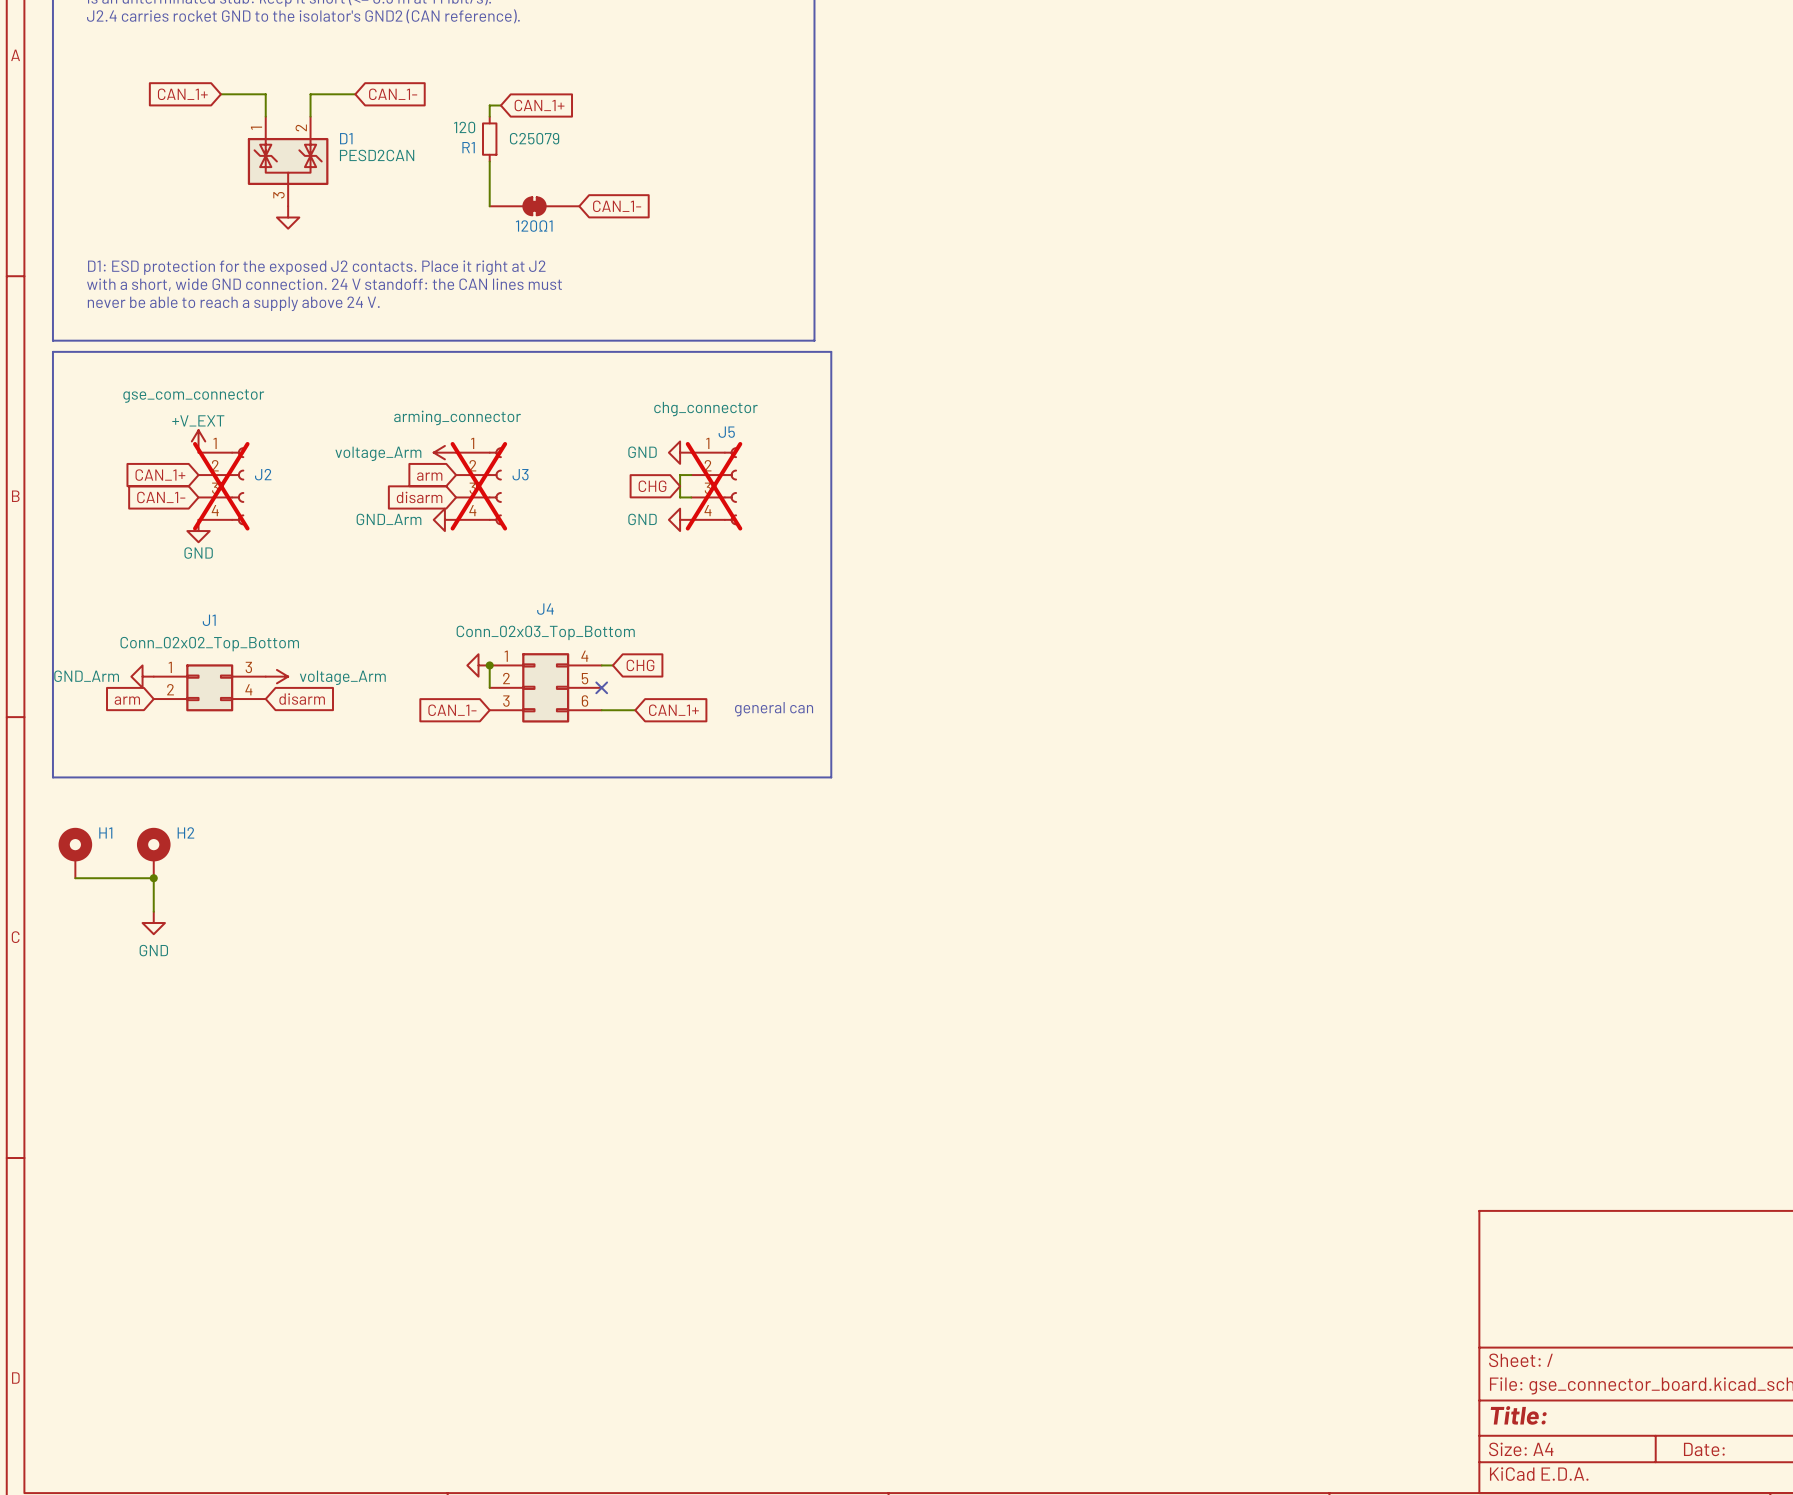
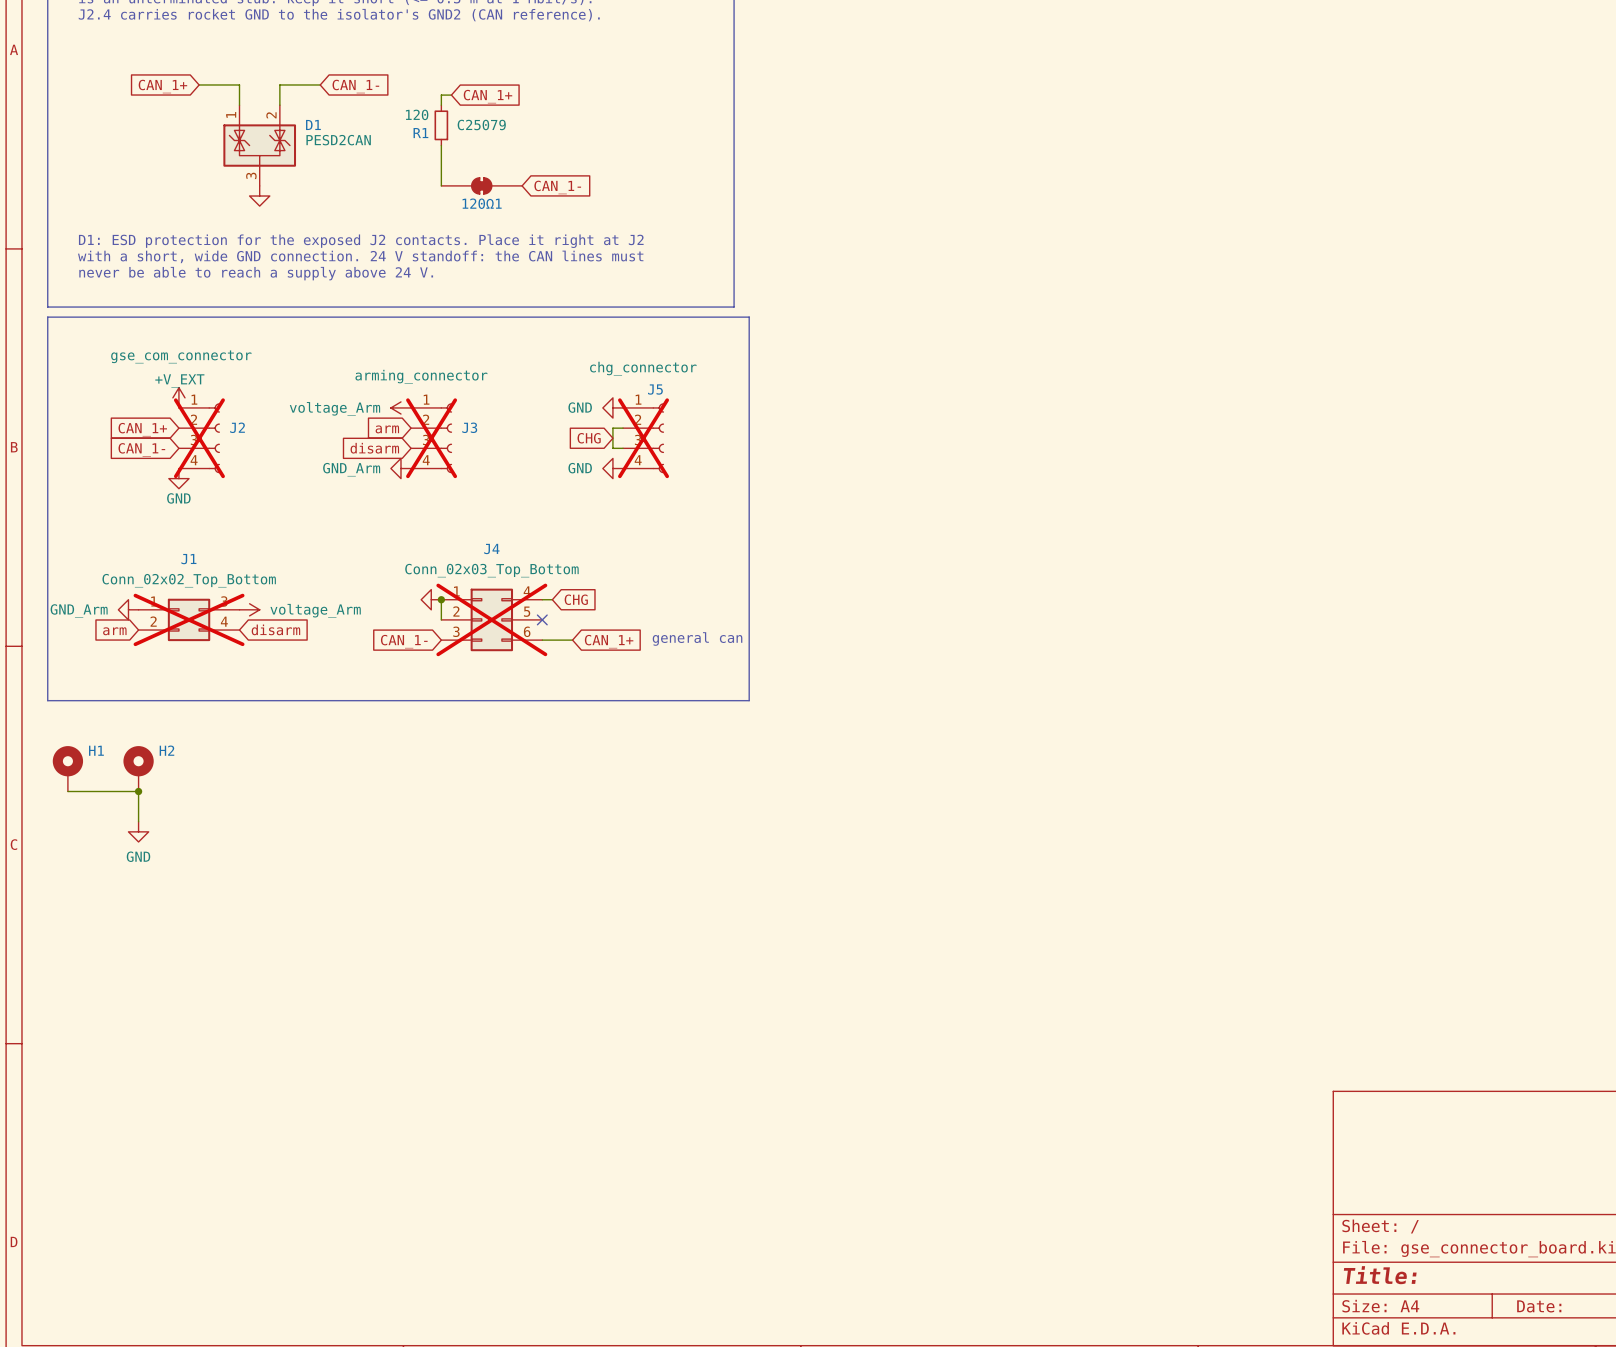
J1 do-not-place cross: none -> (189, 619)
J4 do-not-place cross: none -> (491, 619)

